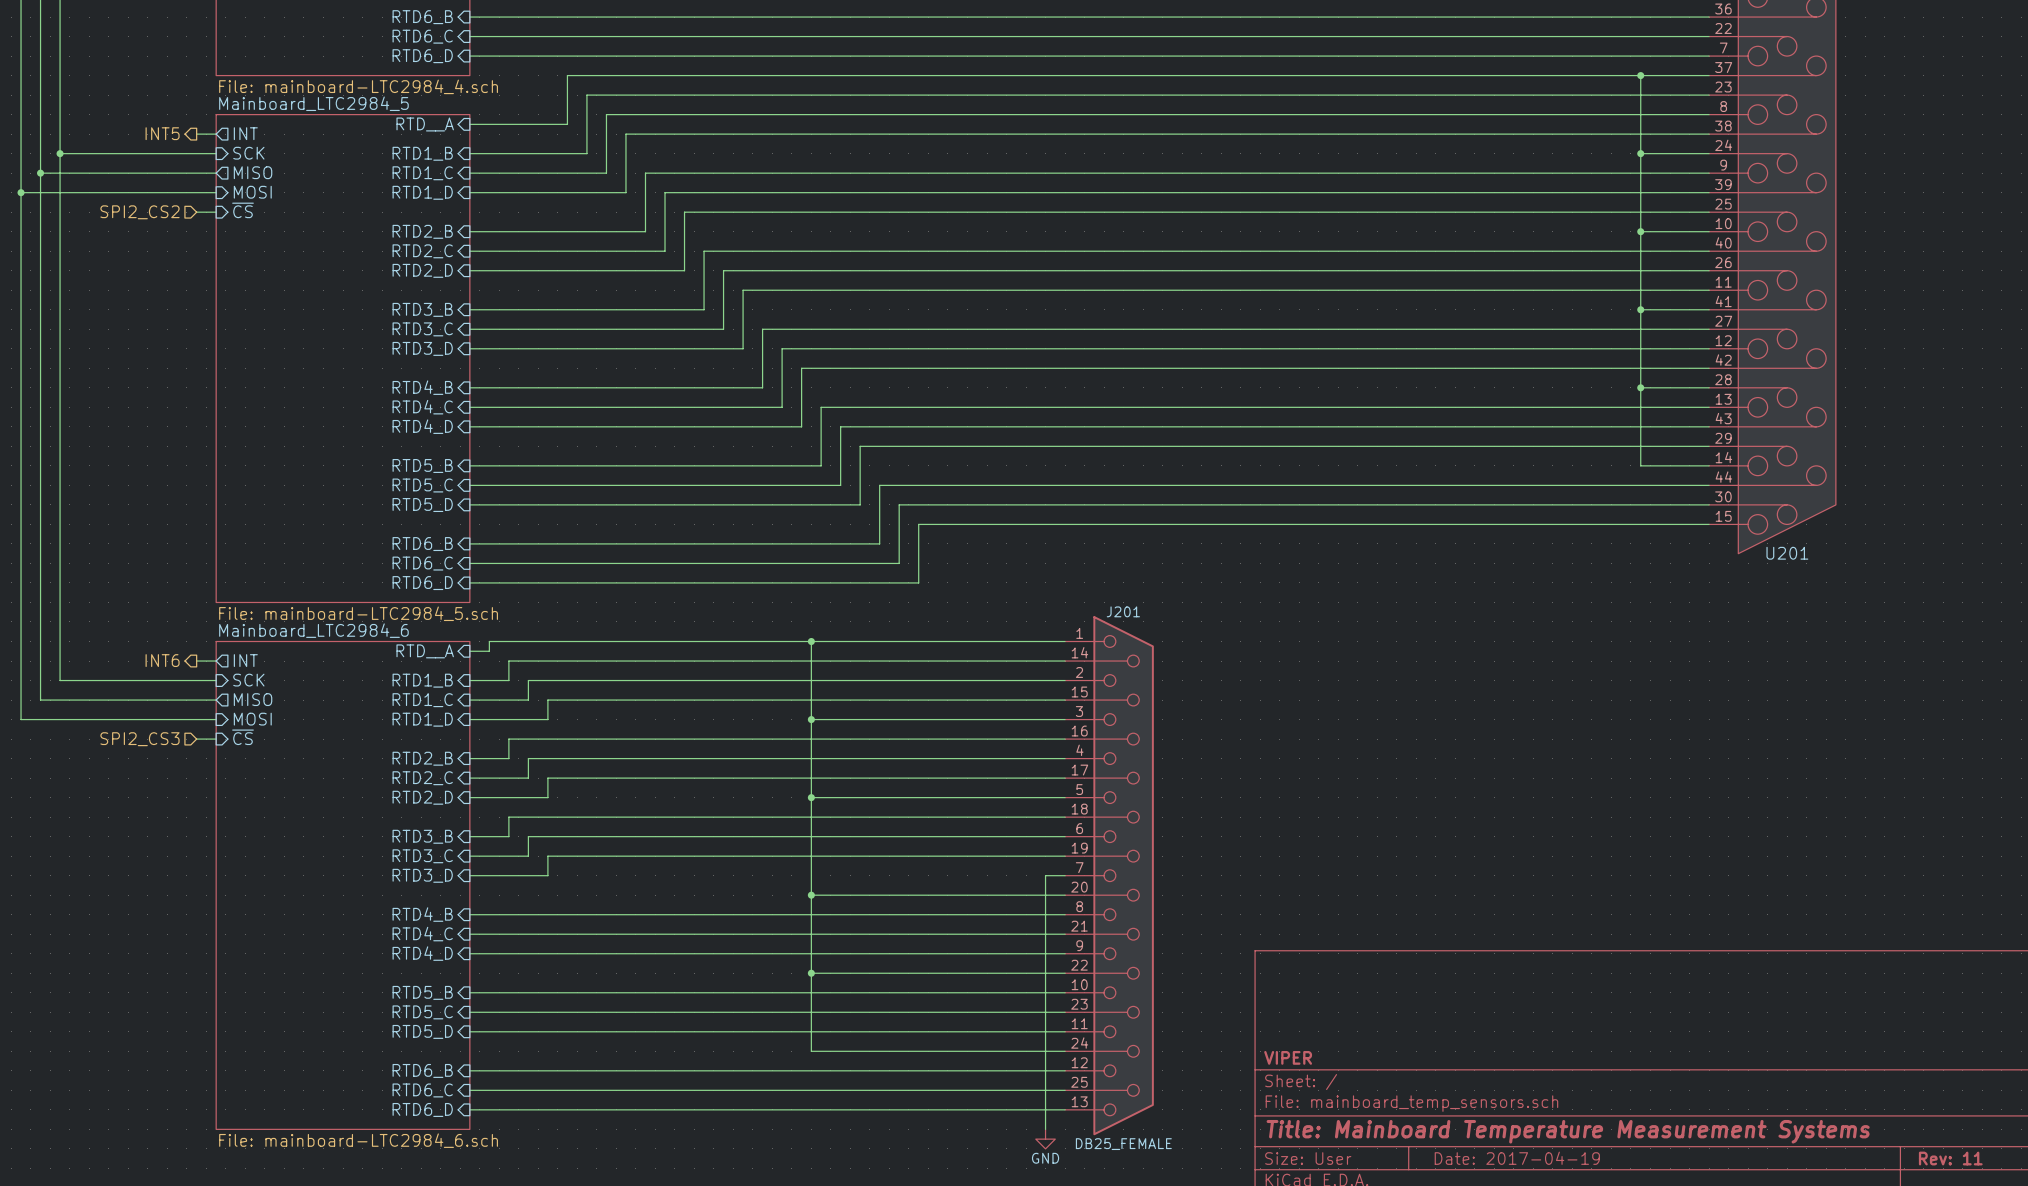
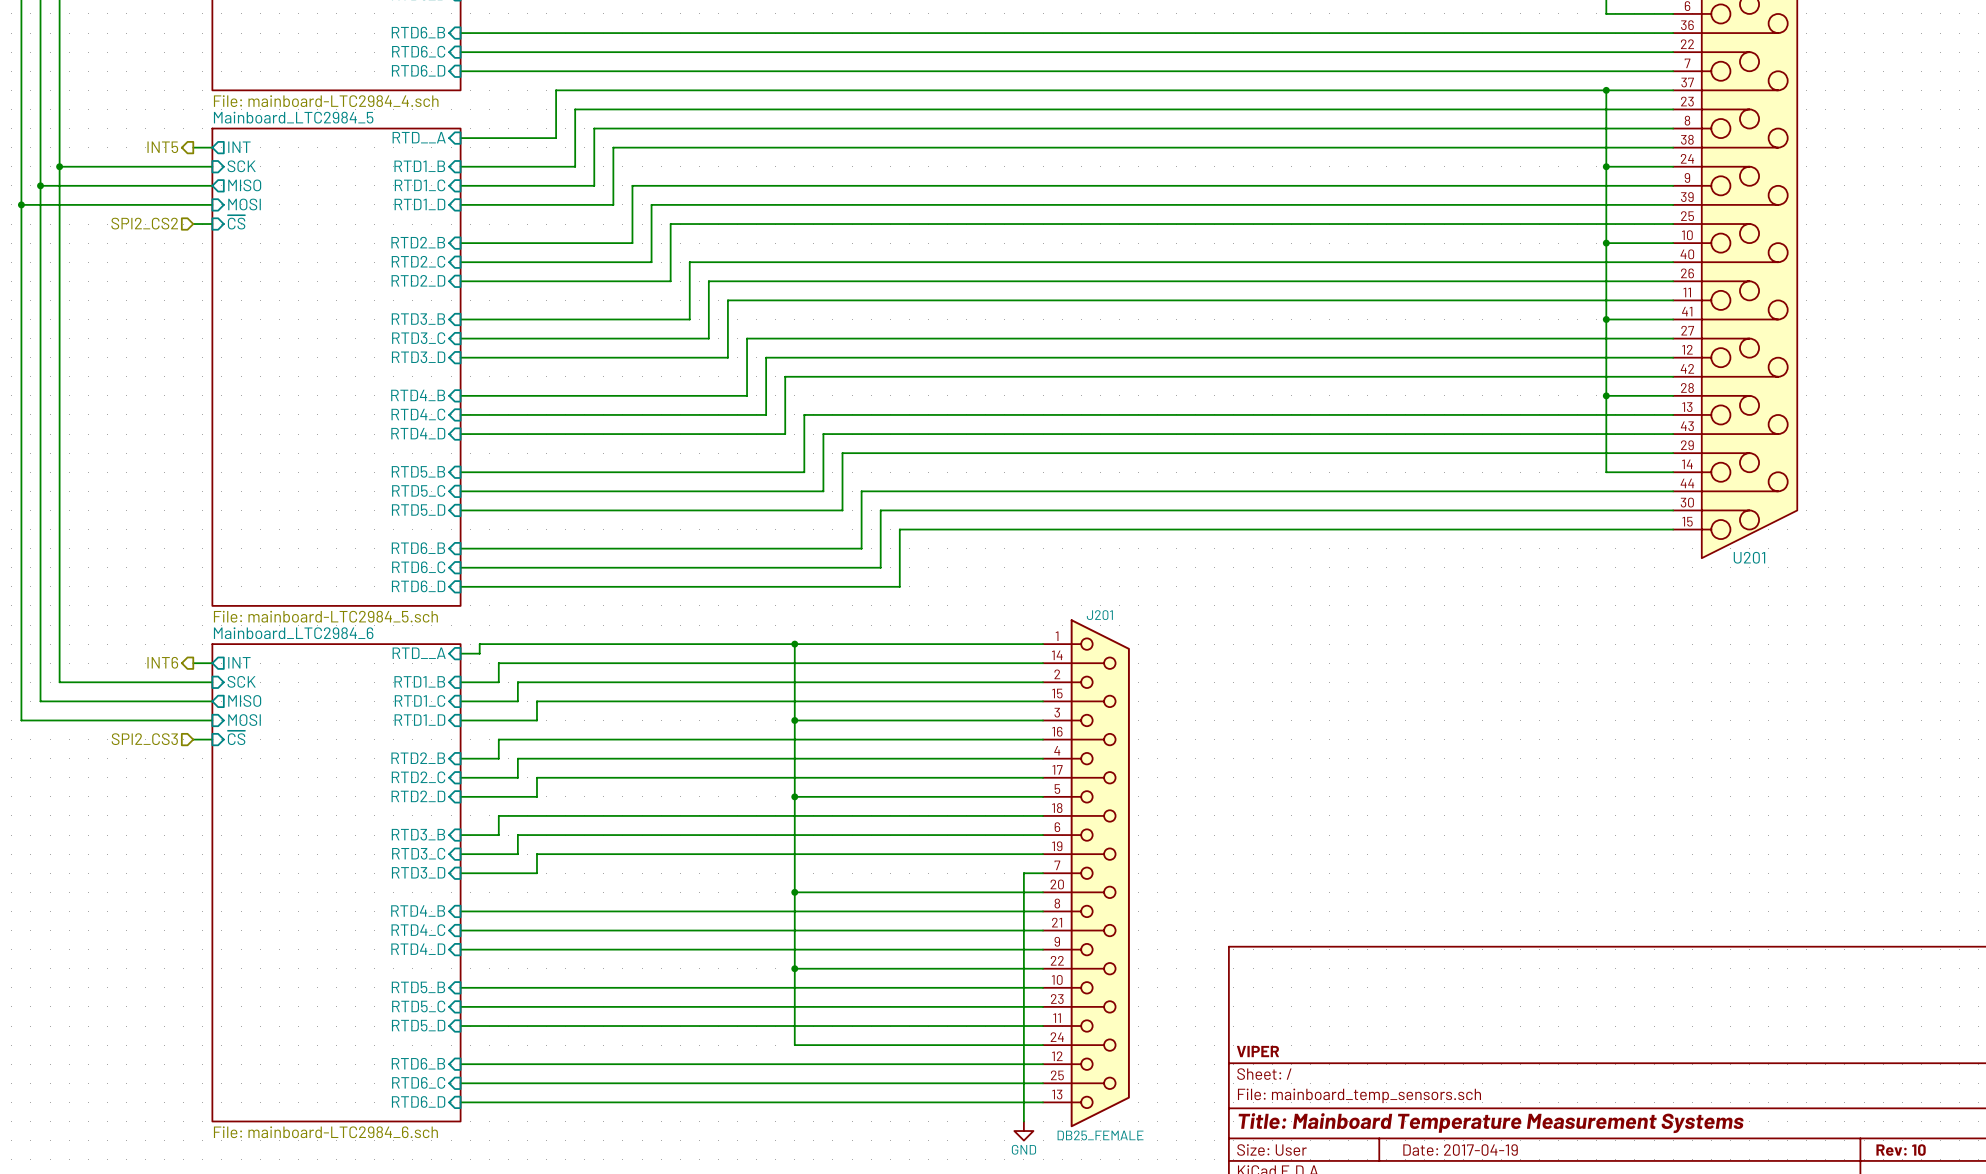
title block: Rev: 11 (1950, 1158) -> Rev: 10 (1901, 1150)

